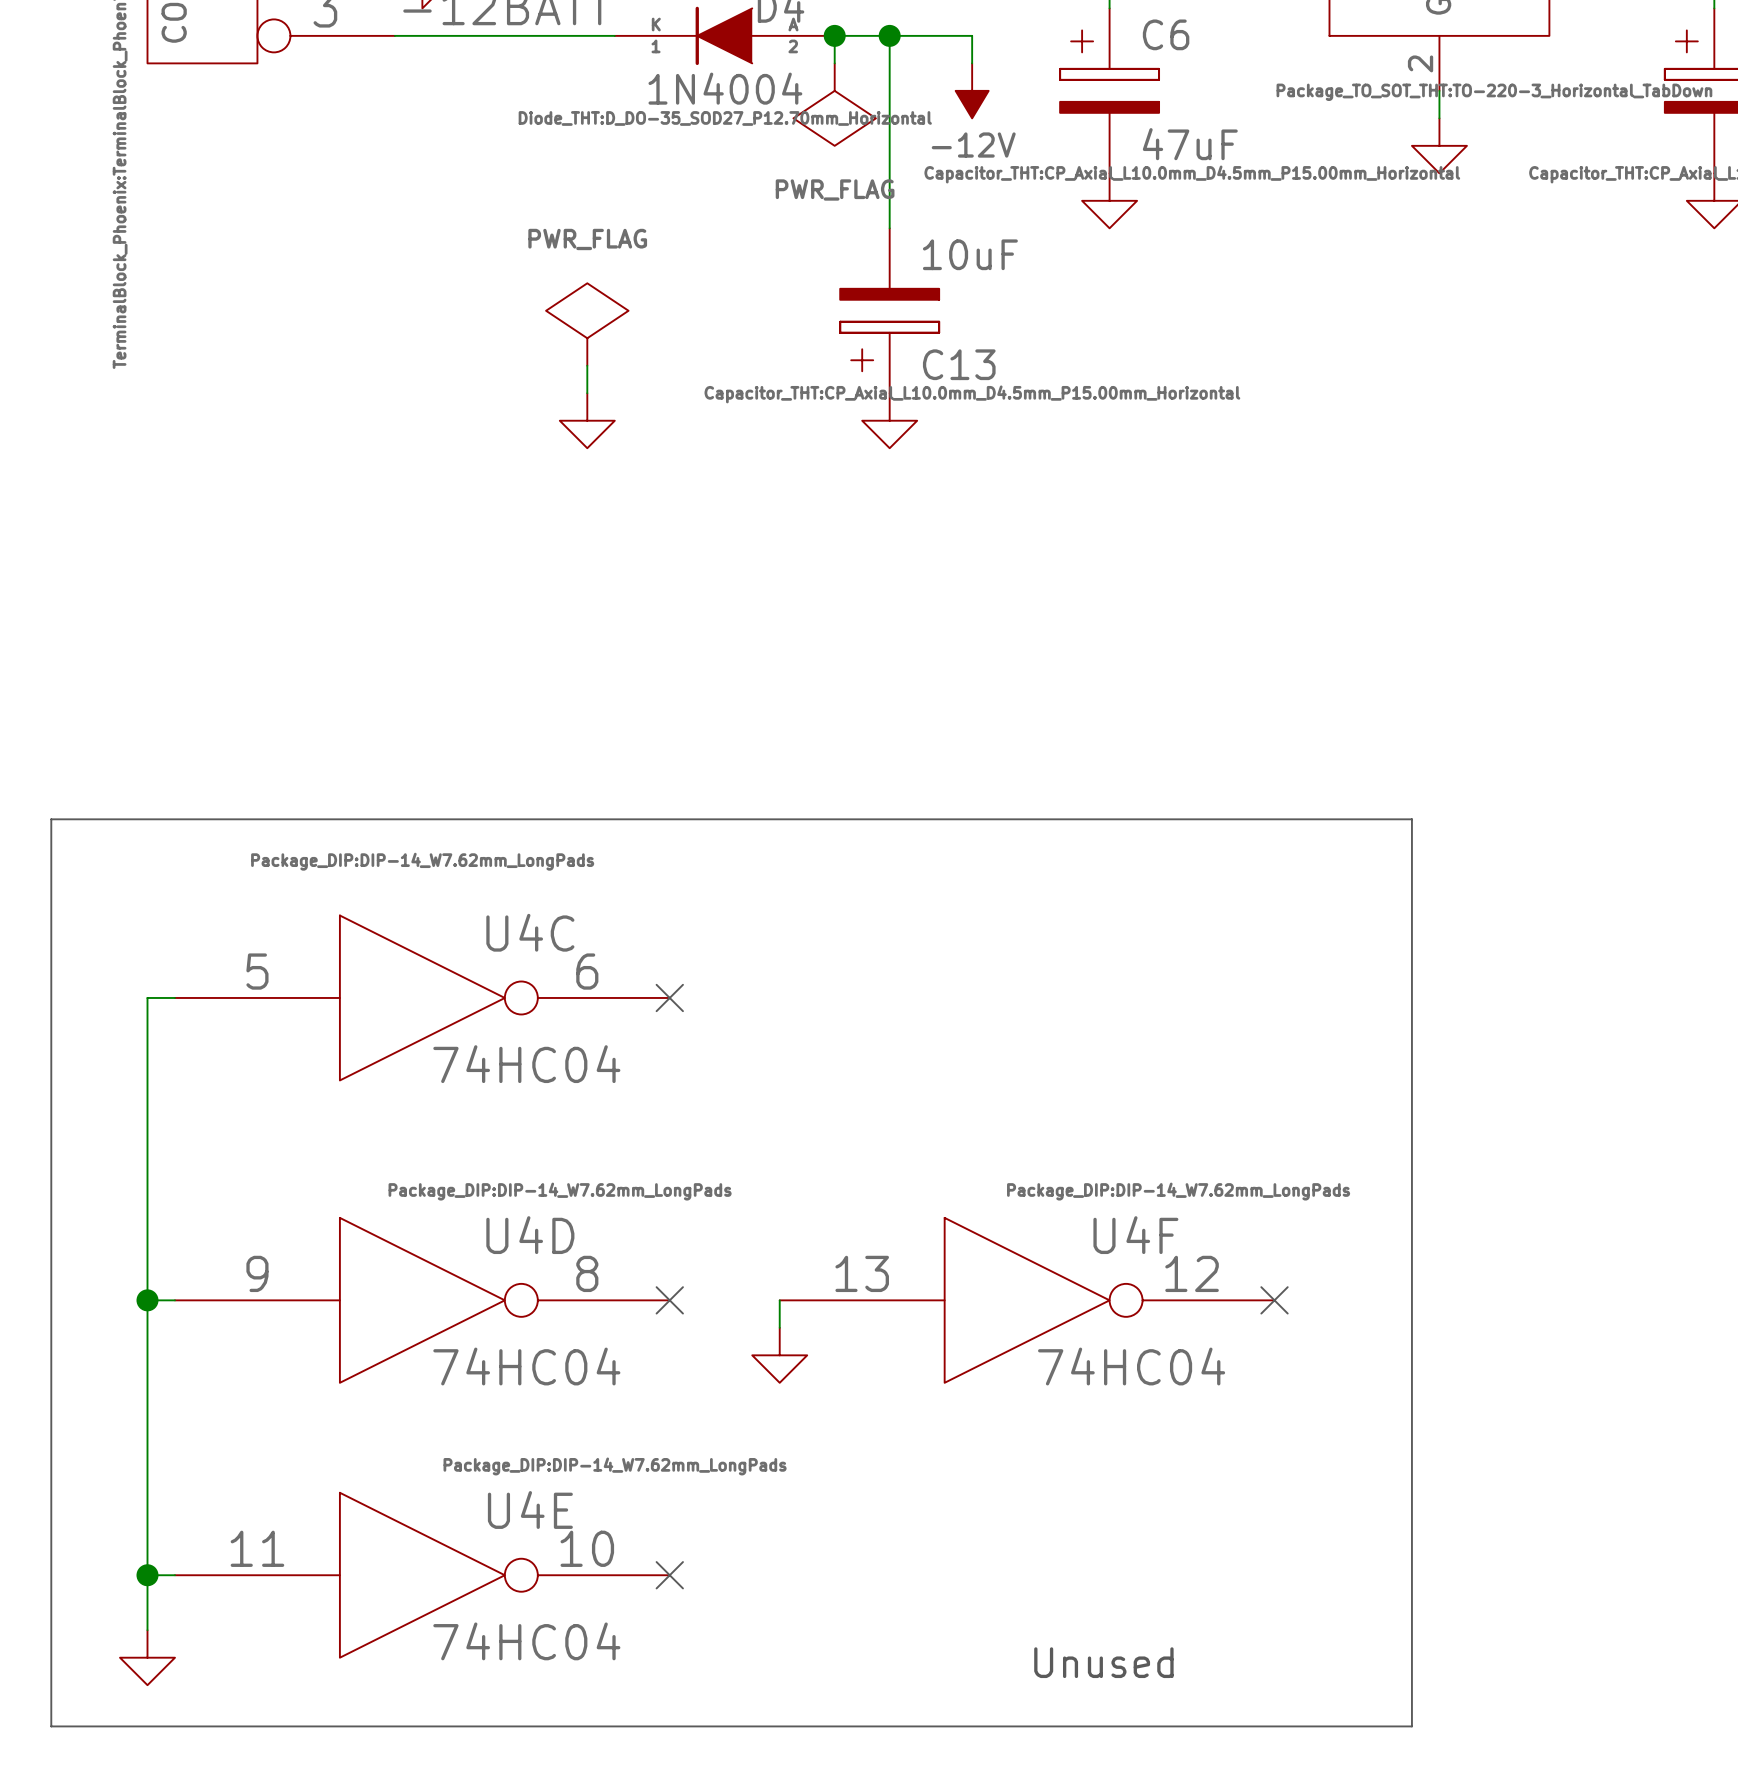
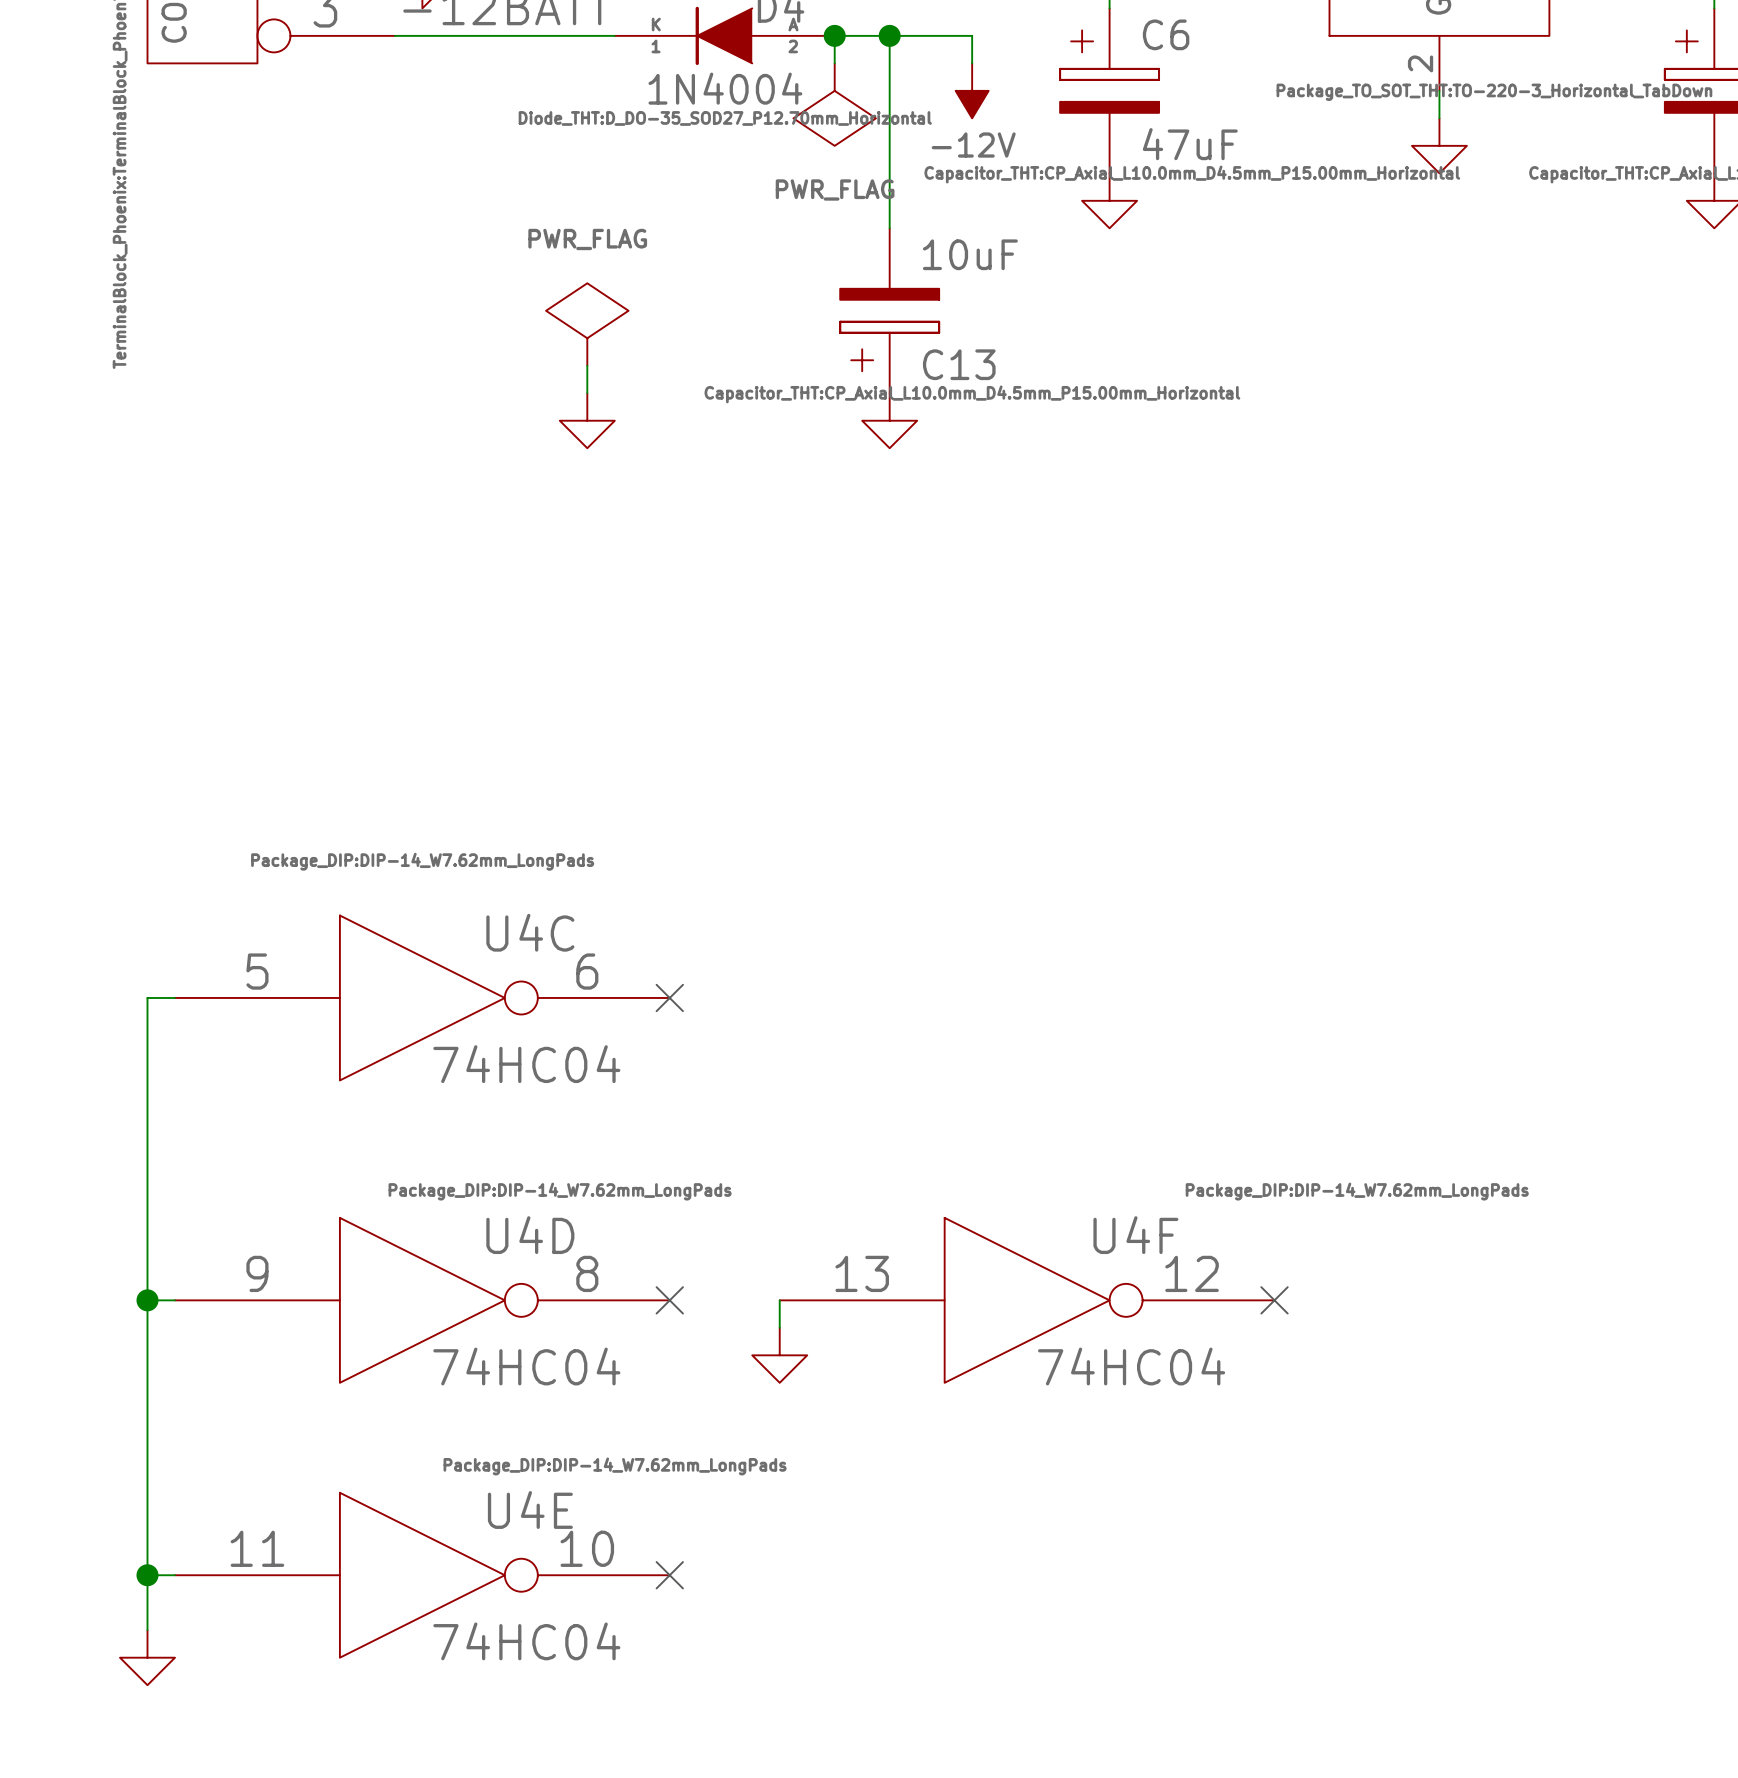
line: (51, 819) (51, 1726) (1411, 1726) (1411, 819) (51, 819) -> none
U4F text position: Package_DIP:DIP-14_W7.62mm_LongPads (1178, 1191) -> Package_DIP:DIP-14_W7.62mm_LongPads (1357, 1191)
text: Unused (1103, 1662) -> none

